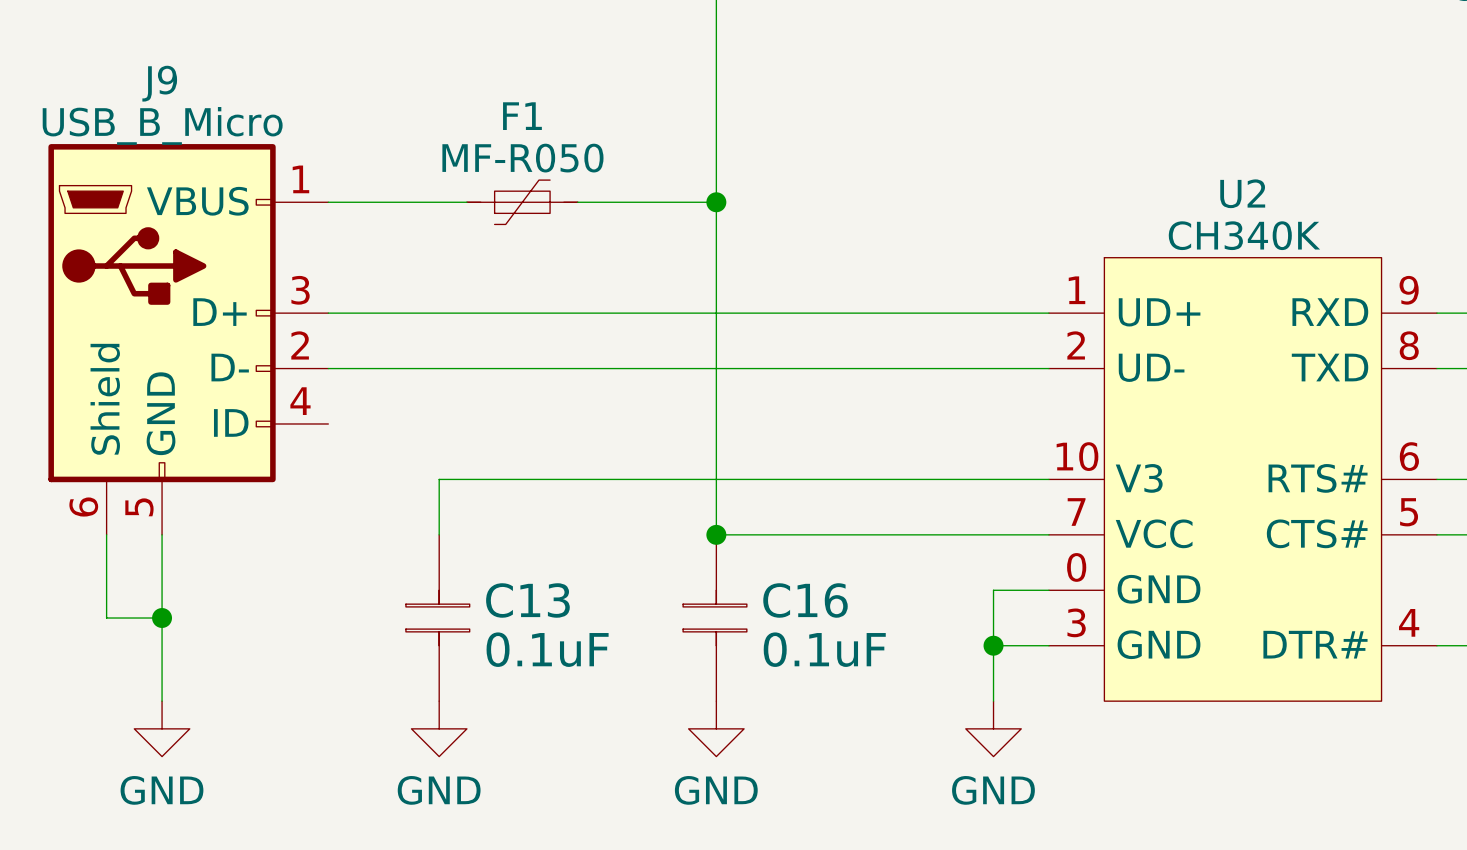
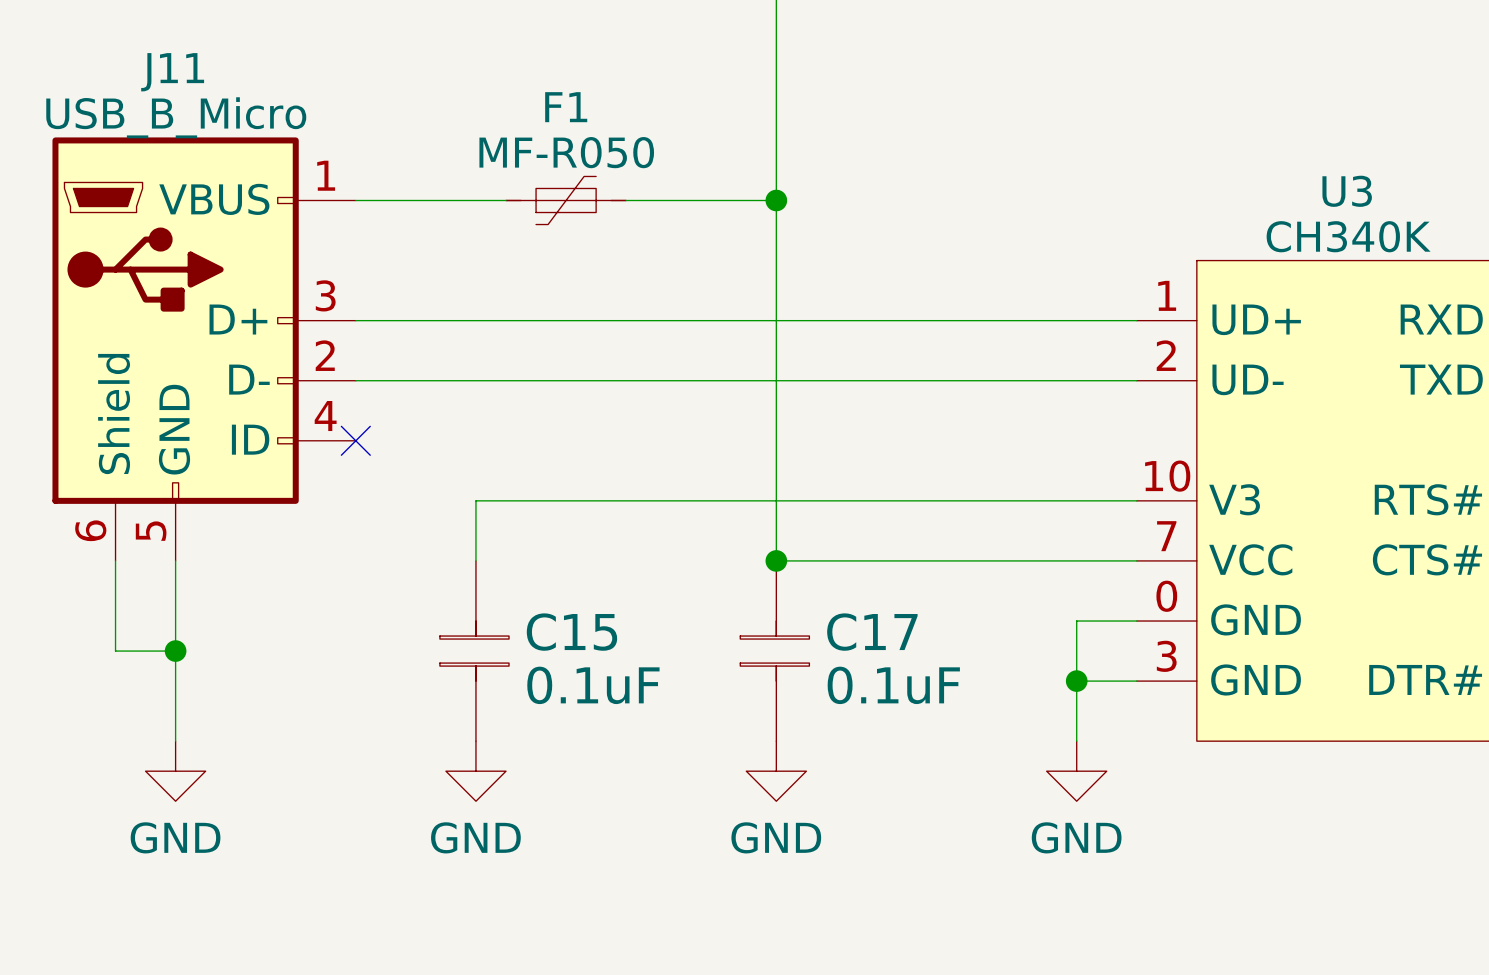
J9 name: J9 (159, 83) -> J11 (172, 72)
U2 name: U2 (1242, 193) -> U3 (1347, 191)
no-connect mark: none -> (355, 440)
C13 name: C13 (527, 600) -> C15 (571, 632)
C16 name: C16 (805, 600) -> C17 (872, 632)

